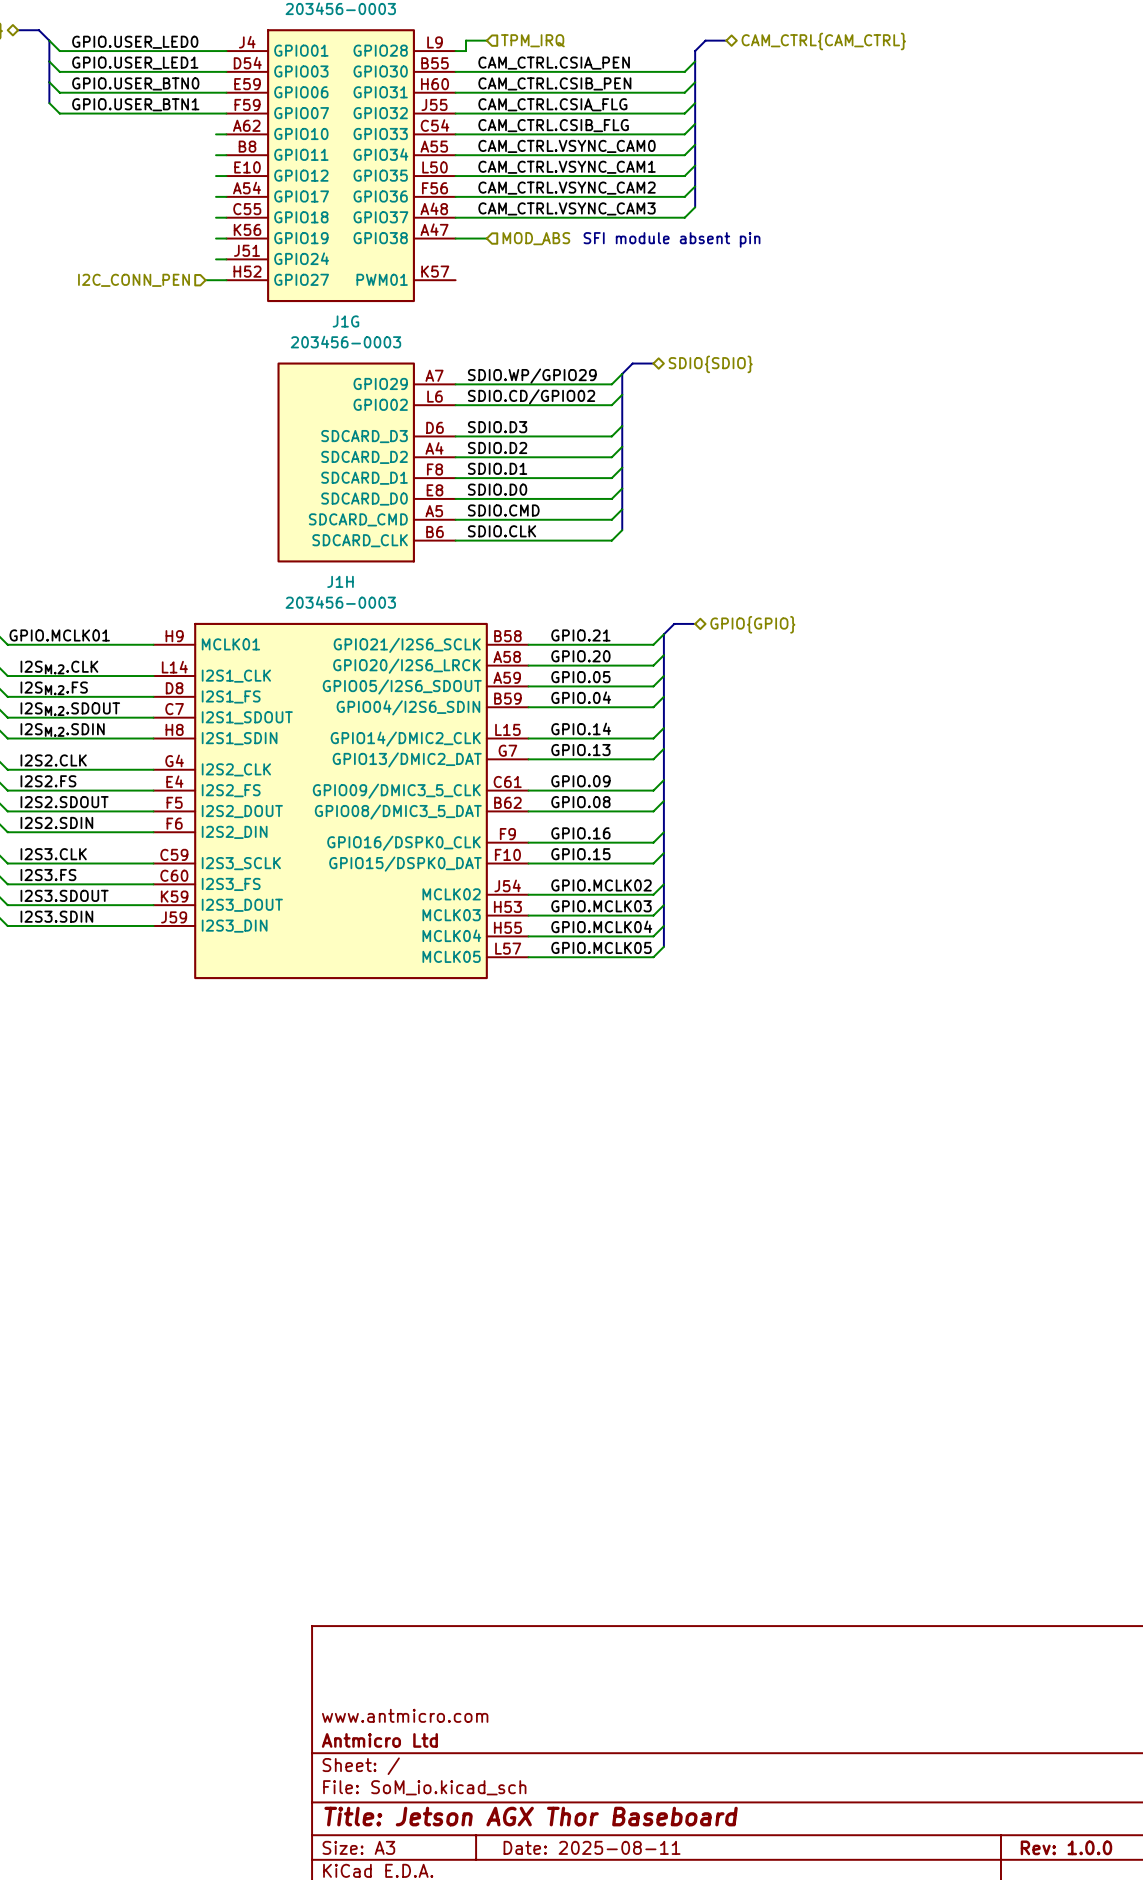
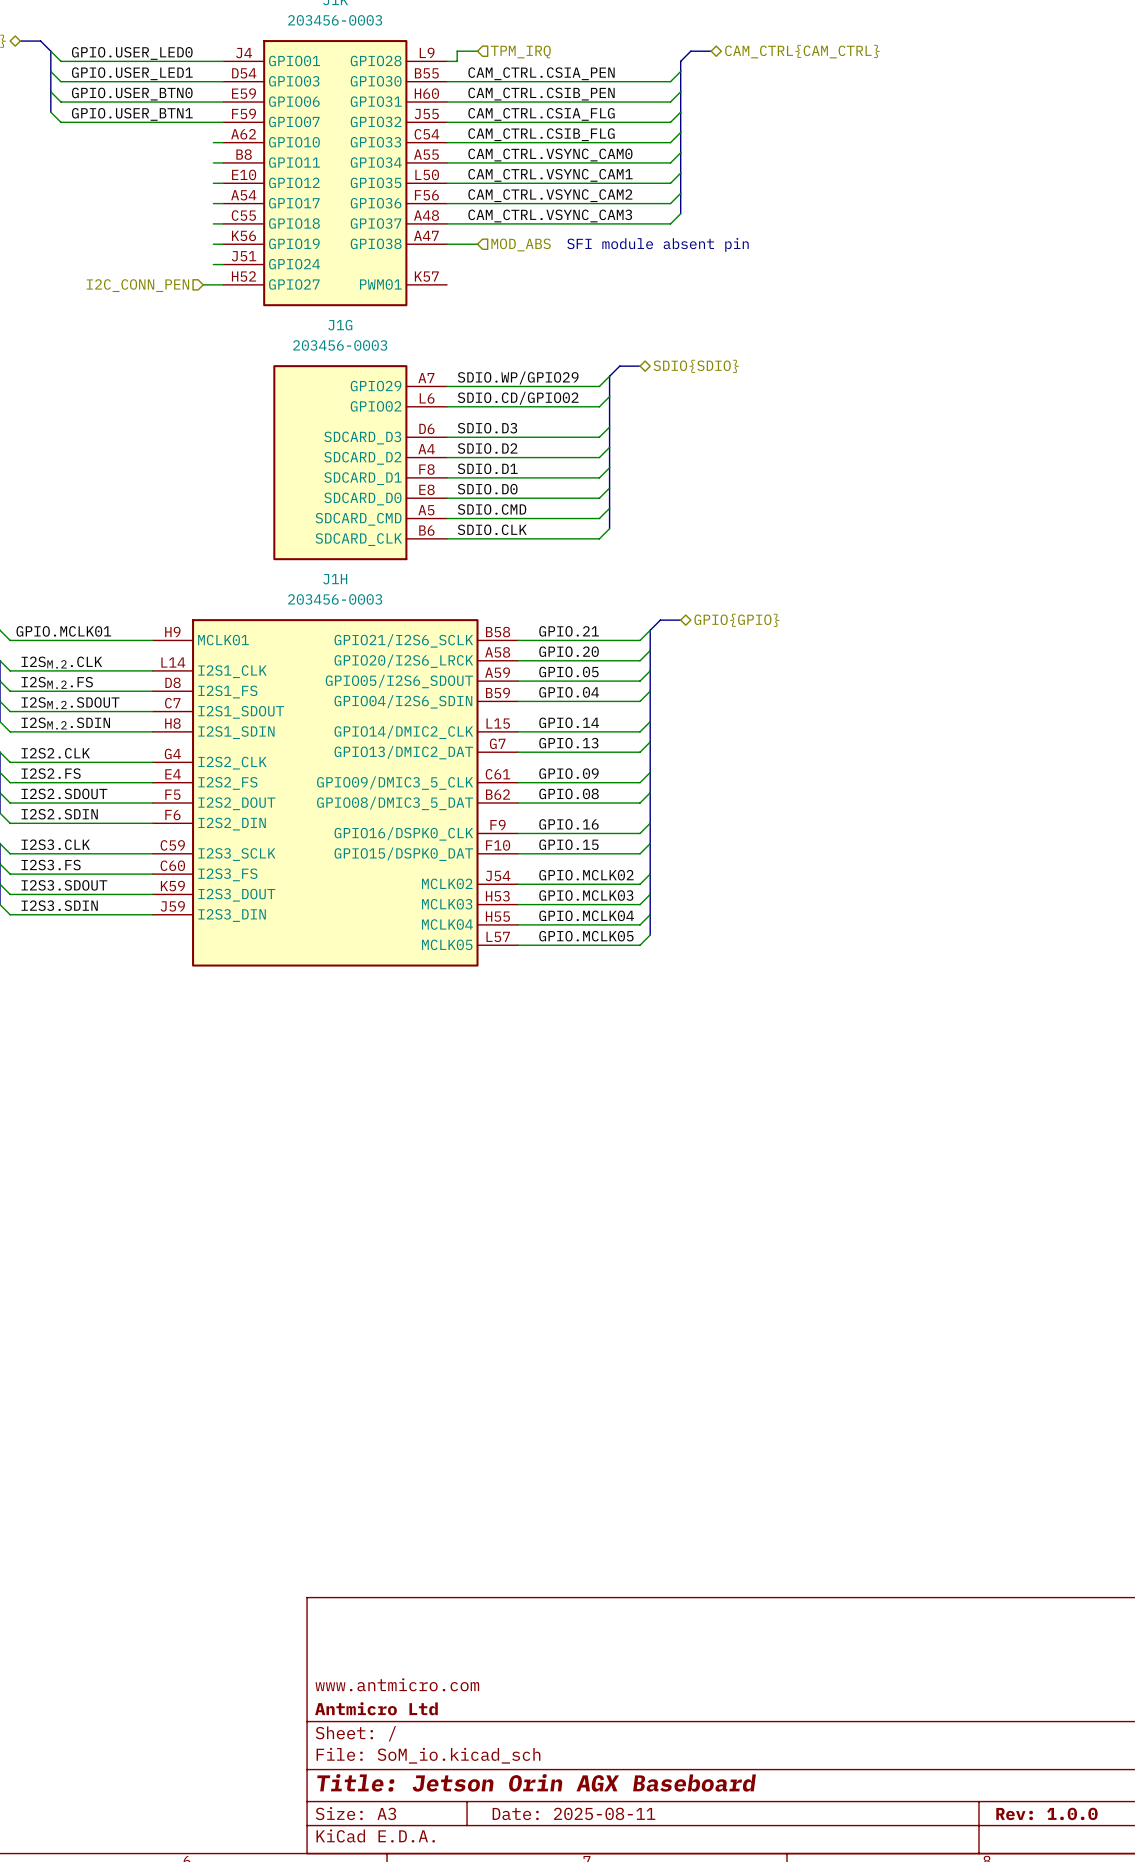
title block: Title: Jetson AGX Thor Baseboard (531, 1816) -> Title: Jetson Orin AGX Baseboard (536, 1782)

